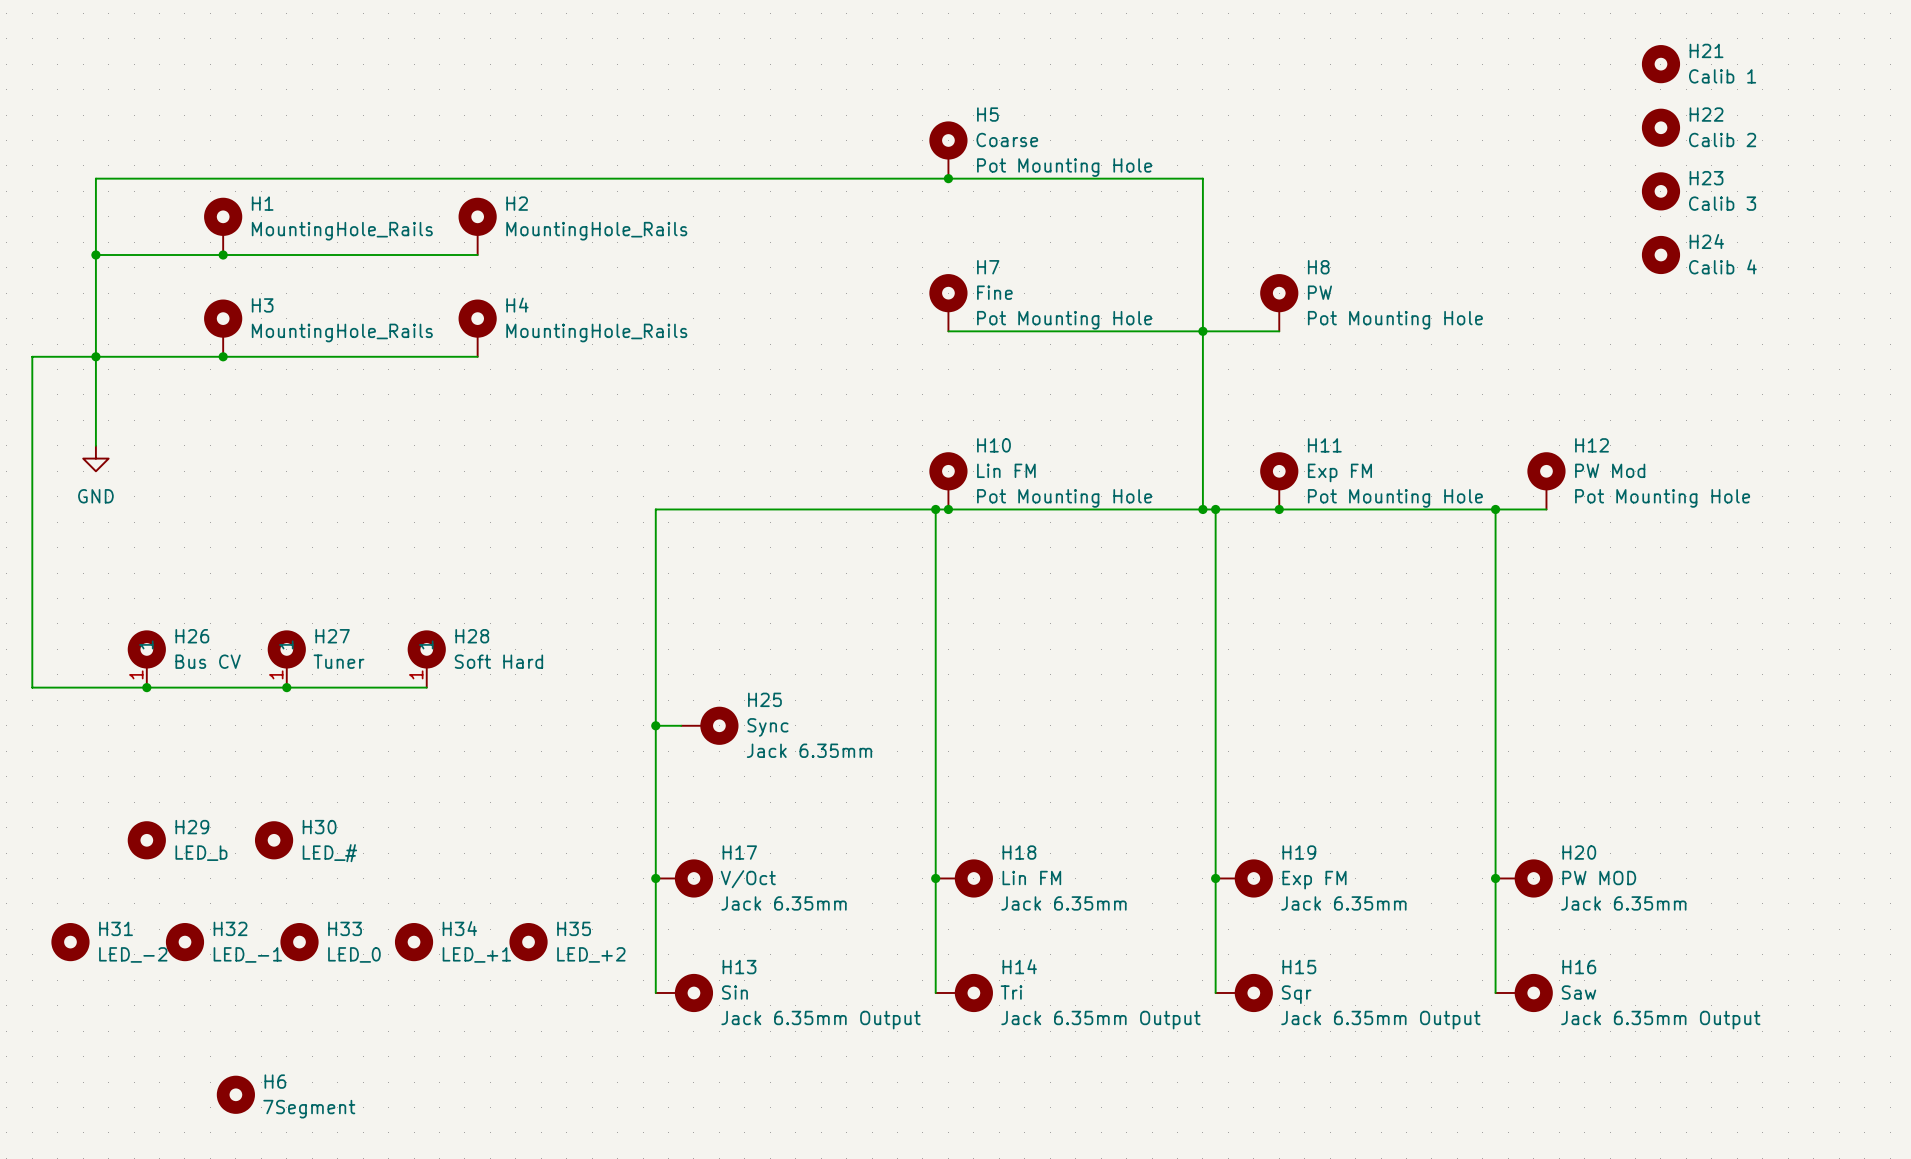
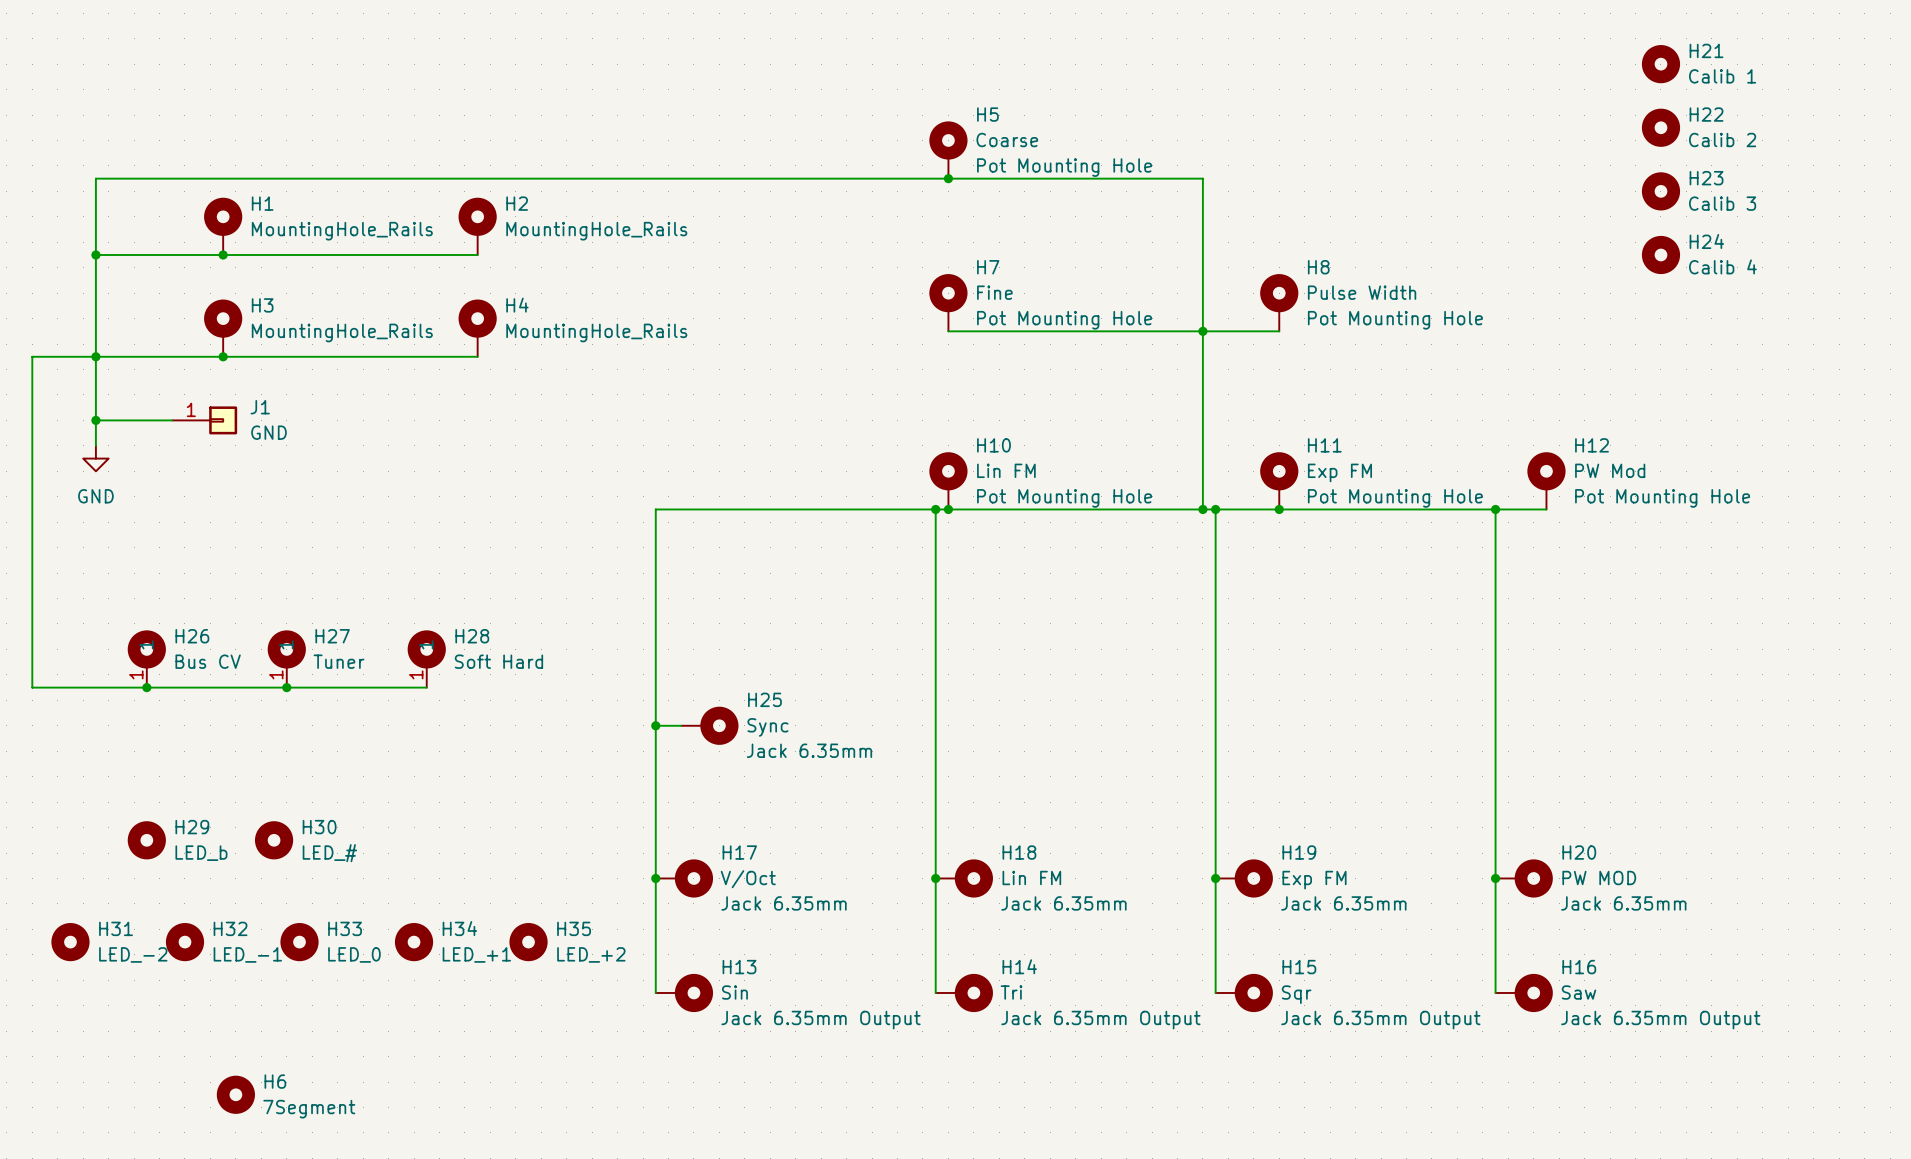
H8 value: PW (1319, 292) -> Pulse Width (1362, 292)
wire: none -> (95, 420) (172, 420)
junction: none -> (95, 420)
J1: none -> GND (204, 420)

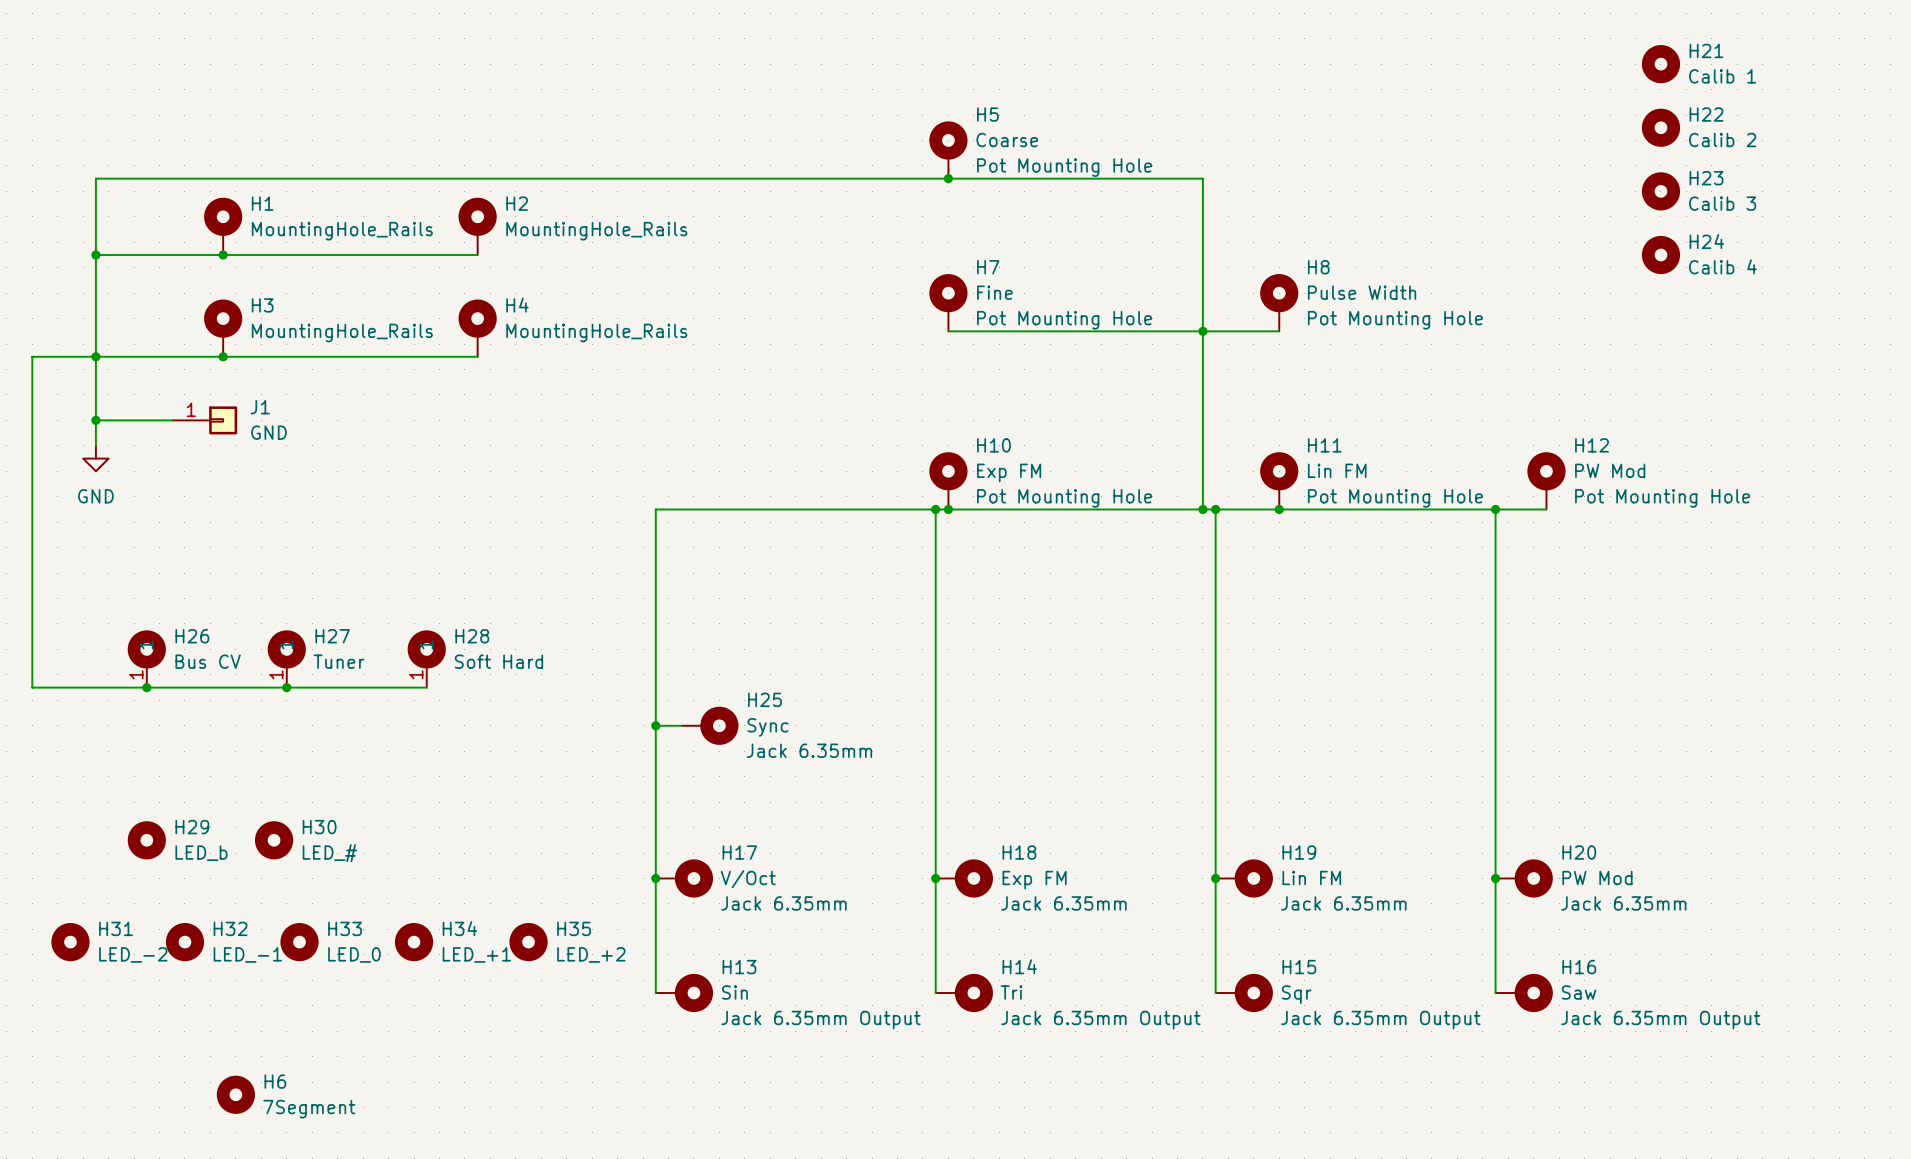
H10 value: Lin FM (1006, 470) -> Exp FM (1009, 472)
H11 value: Exp FM (1339, 472) -> Lin FM (1337, 470)
H18 value: Lin FM (1031, 877) -> Exp FM (1034, 880)
H20 value: PW MOD (1599, 877) -> PW Mod (1597, 877)
H19 value: Exp FM (1314, 880) -> Lin FM (1311, 877)

